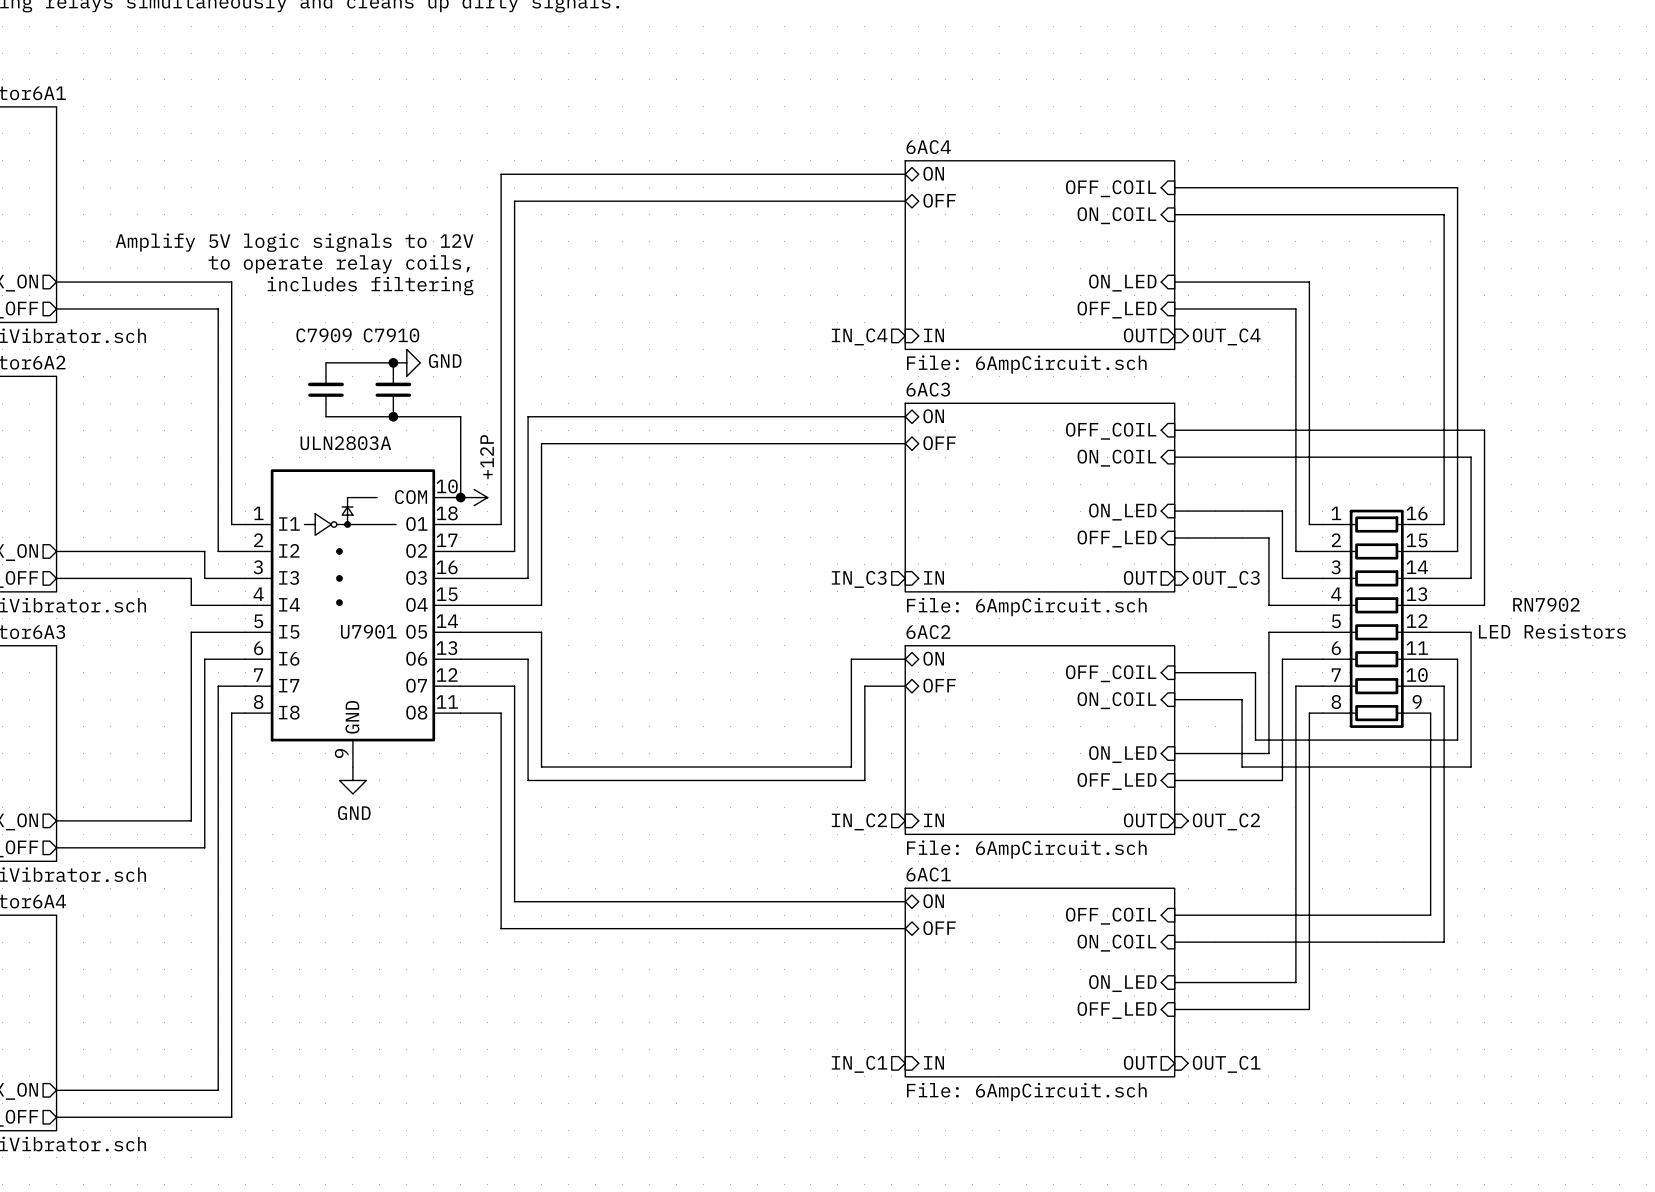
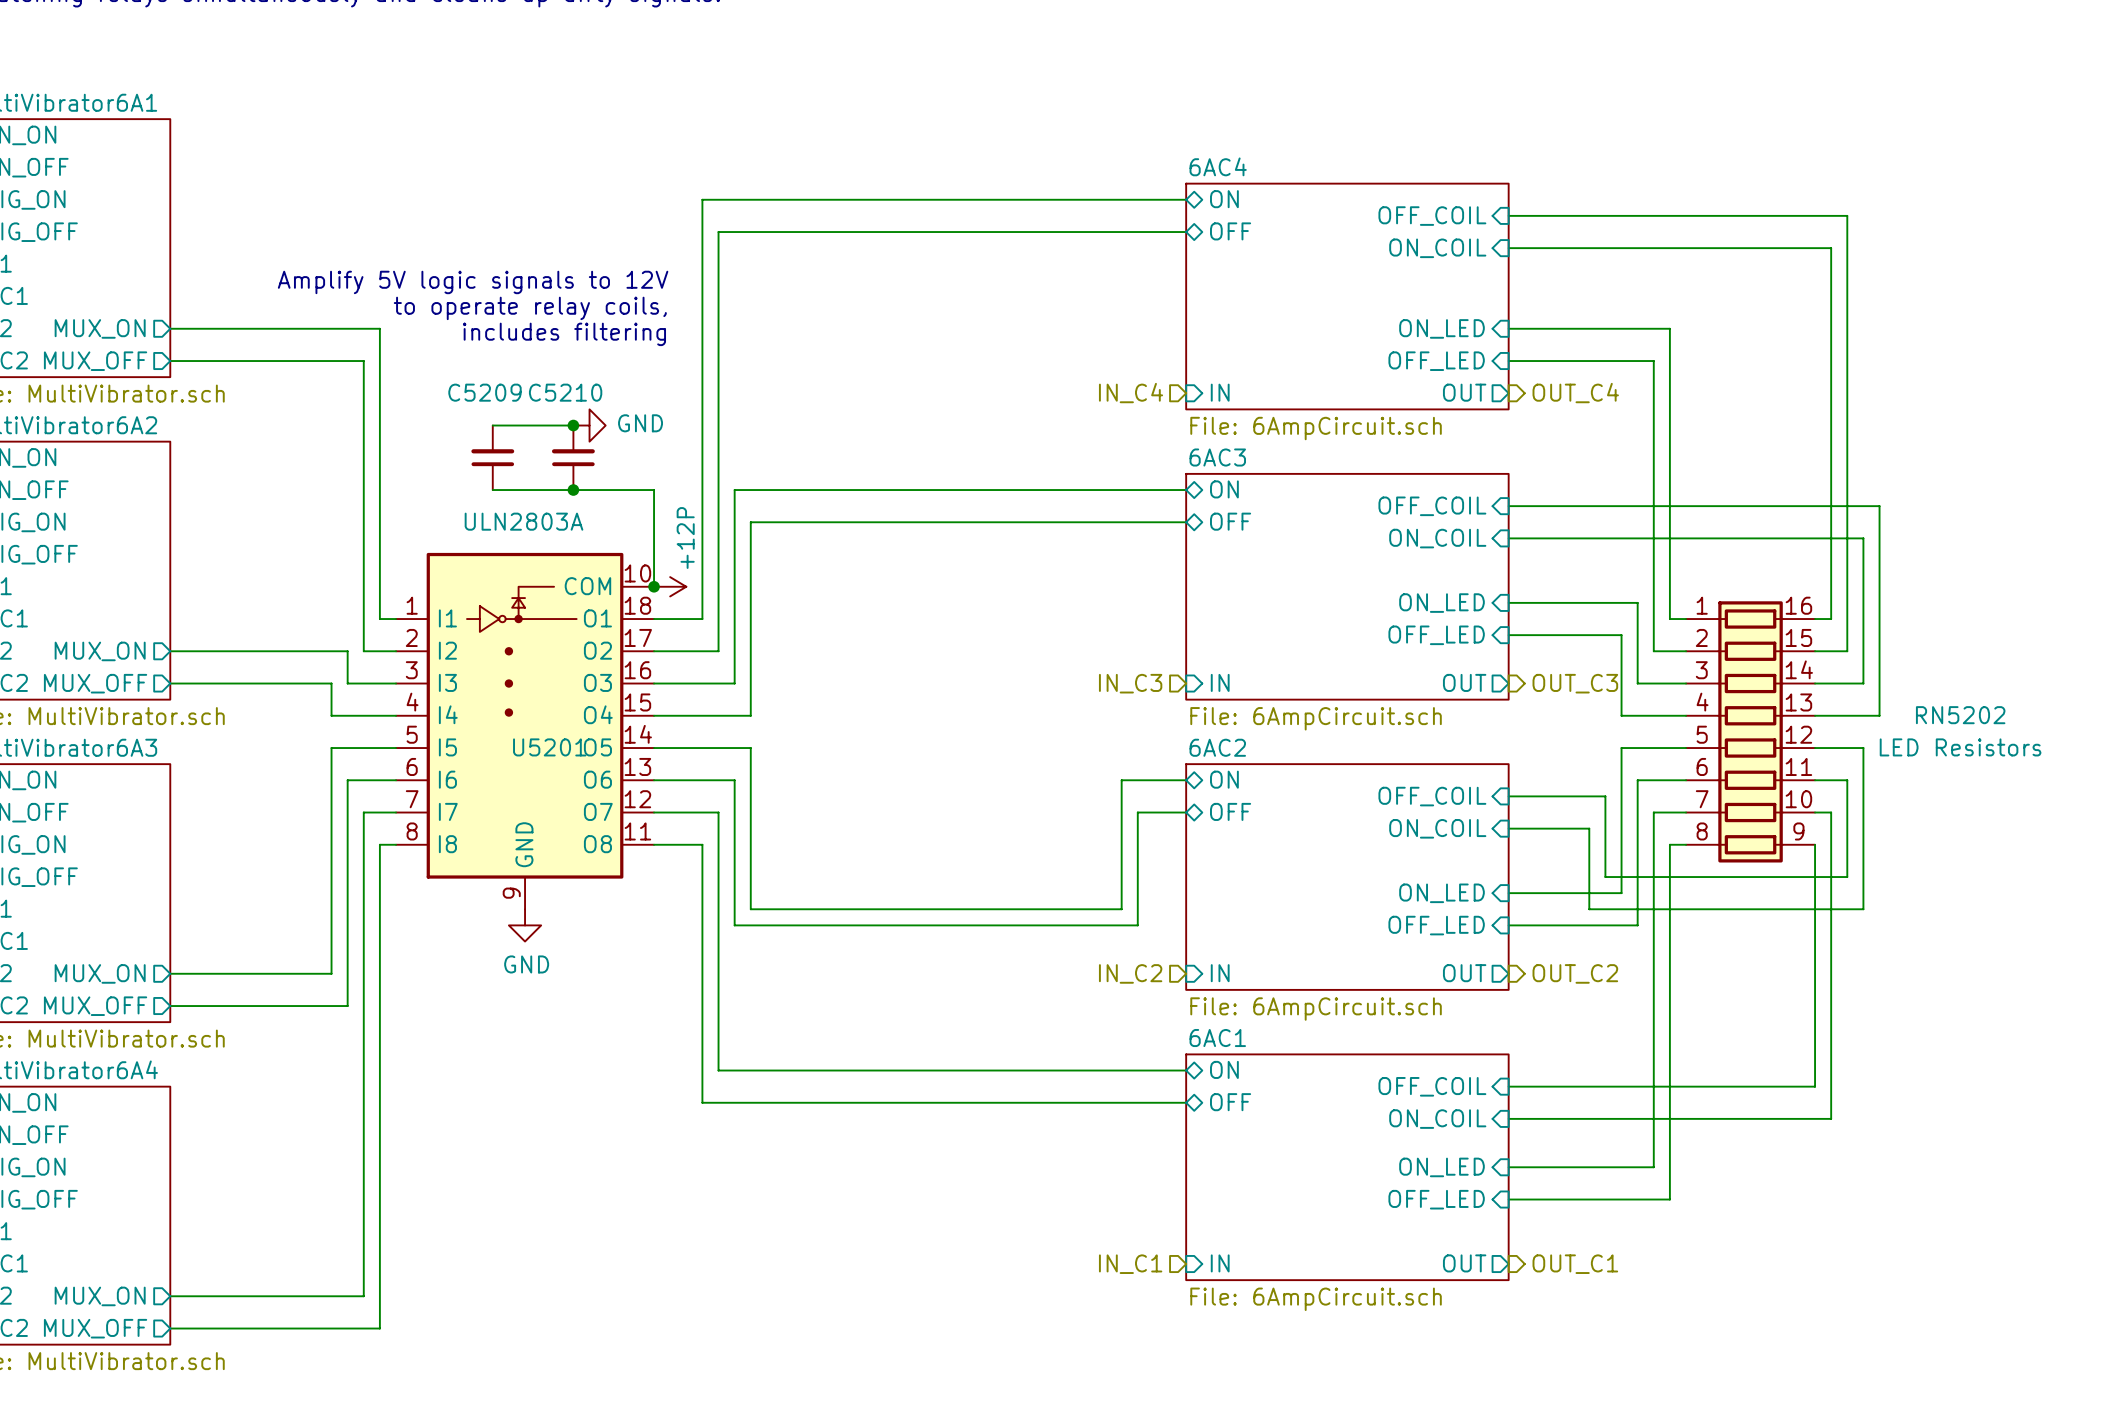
C7909 name: C7909 (324, 335) -> C5209 (484, 392)
C7910 name: C7910 (391, 335) -> C5210 (565, 392)
RN7902 name: RN7902 (1546, 604) -> RN5202 (1960, 715)
U7901 name: U7901 (368, 631) -> U5201 (549, 747)

